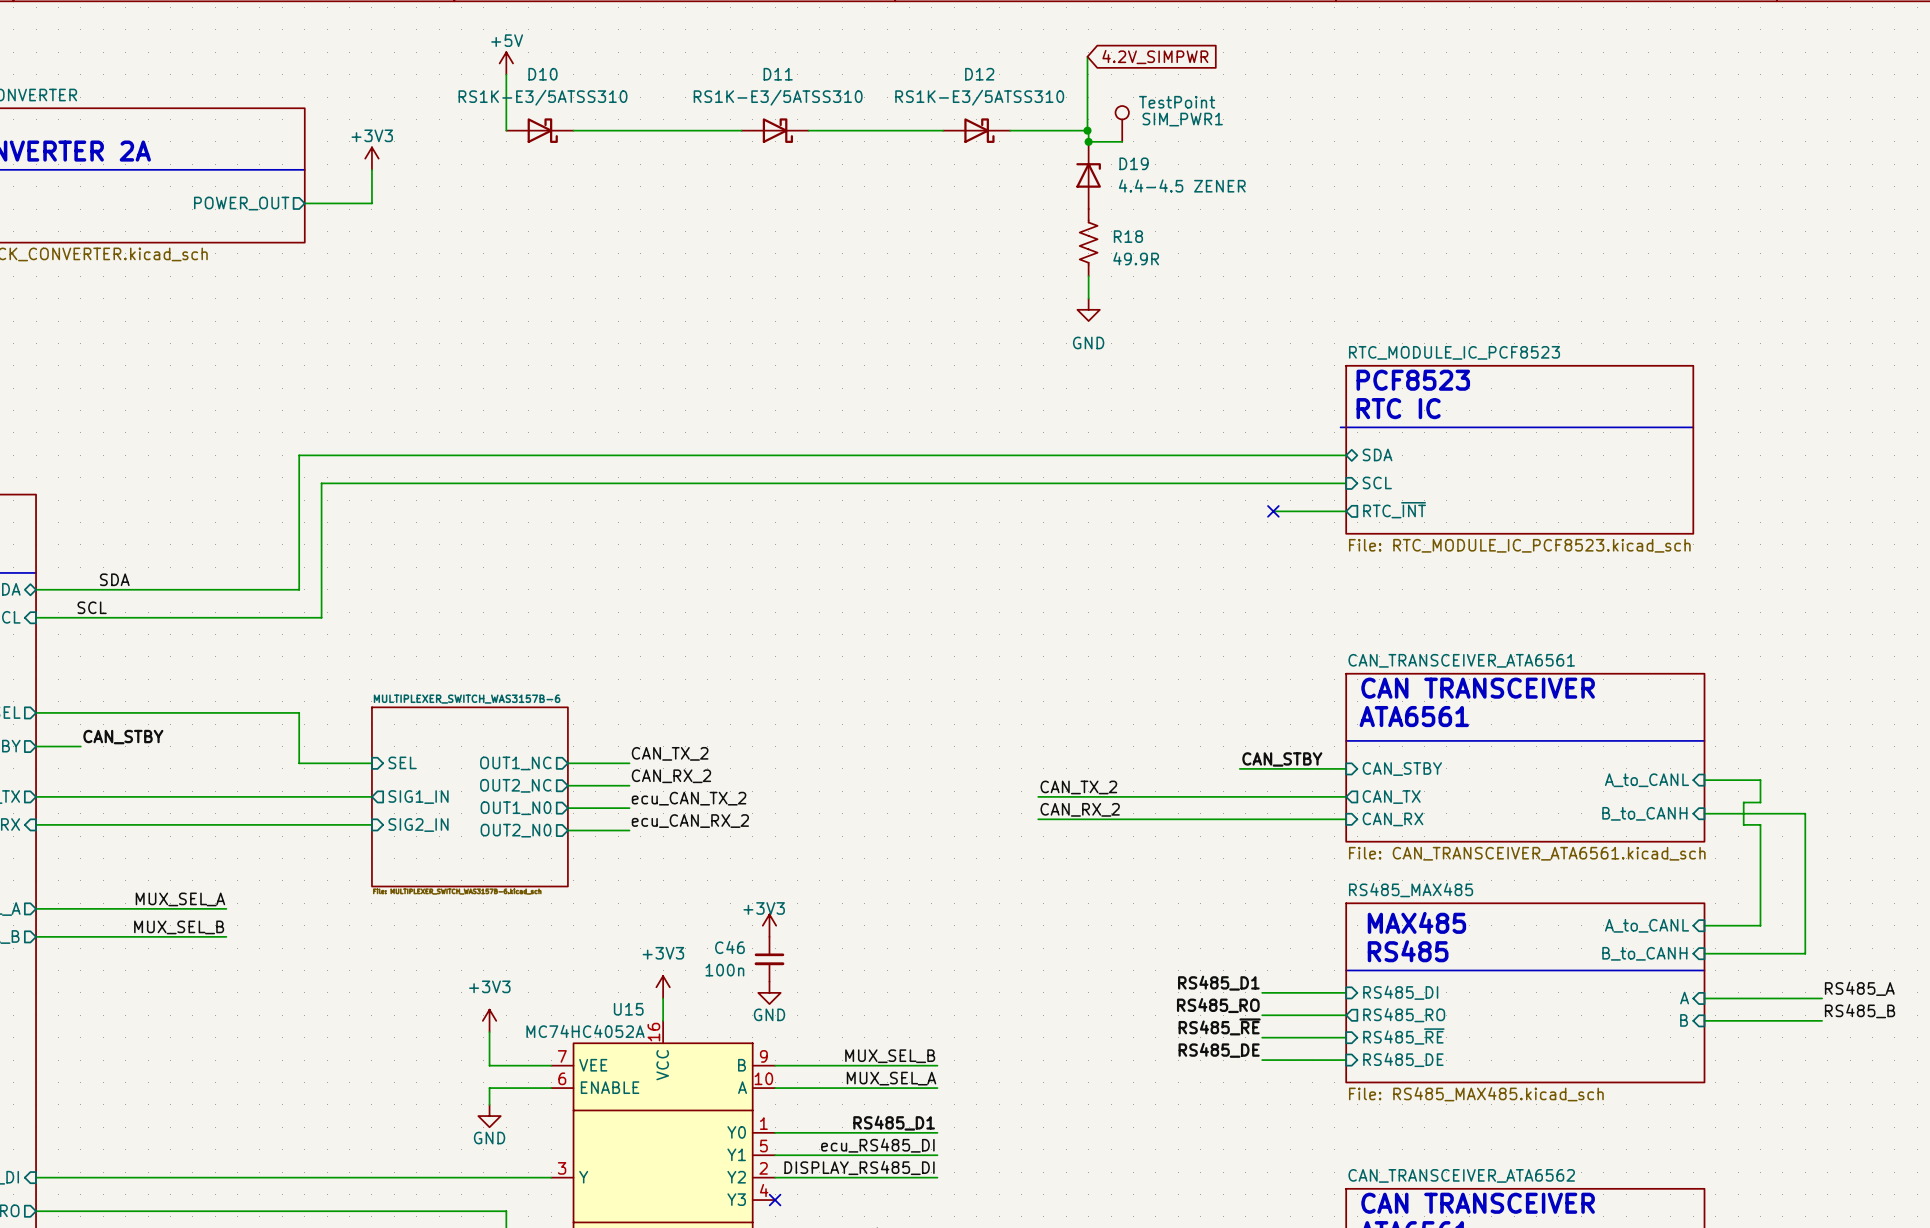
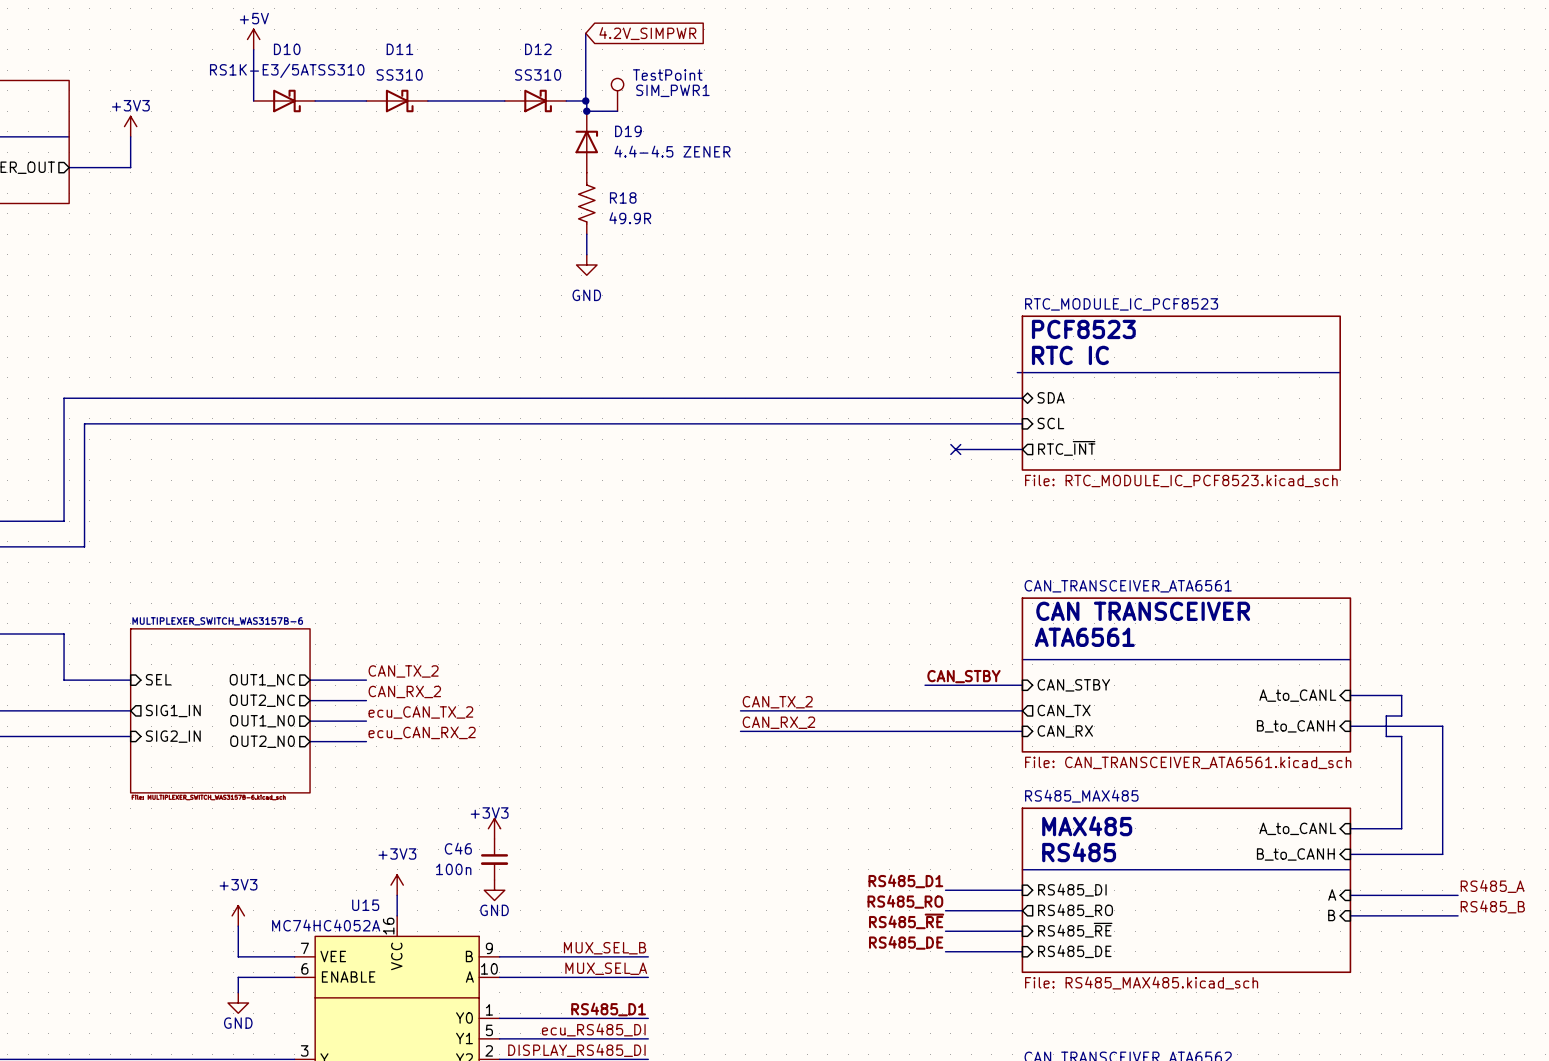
wire: (1087, 56) (1087, 130) -> (585, 33) (585, 100)
global label position: 4.2V_SIMPWR (1155, 57) -> 4.2V_SIMPWR (647, 33)
D11 value: RS1K-E3/5ATSS310 (778, 97) -> SS310 (399, 74)
D12 value: RS1K-E3/5ATSS310 (979, 97) -> SS310 (538, 74)
SIM_PWR1 position: (1122, 123) -> (617, 94)
D11 position: (775, 130) -> (397, 100)
junction: none -> (585, 100)
wire: (870, 130) (943, 130) -> (586, 100) (586, 111) (617, 111)
D12 position: (976, 130) -> (535, 100)
wire: (1010, 130) (1088, 130) (1088, 141) (1122, 141) -> none
junction: (1087, 130) -> none
junction: none -> (586, 111)
junction: (1088, 141) -> none
D19 position: (1088, 175) -> (586, 141)
R18 position: (1088, 242) -> (586, 203)
wire: (1088, 276) (1088, 298) -> (586, 234) (586, 254)
power symbol position: GND (1088, 309) -> GND (586, 264)

